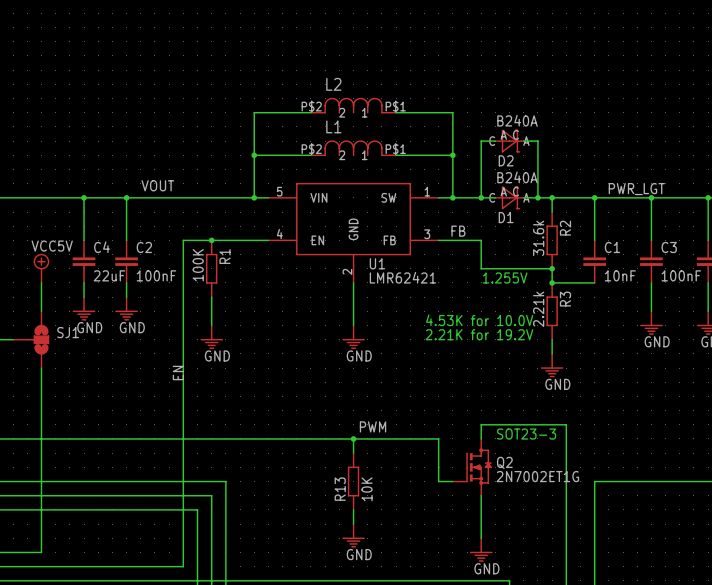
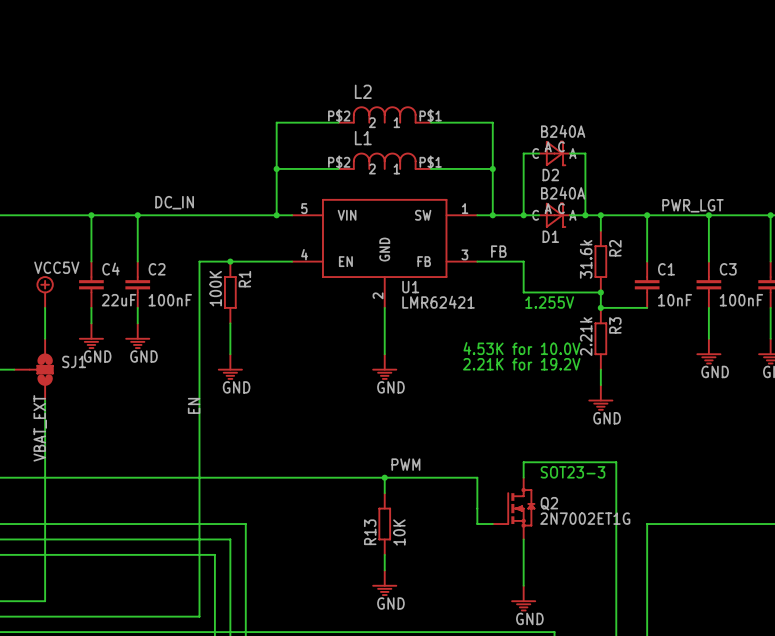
label: VOUT (157, 185) -> DC_IN (174, 202)
label: none -> VBAT_EXT (40, 428)

